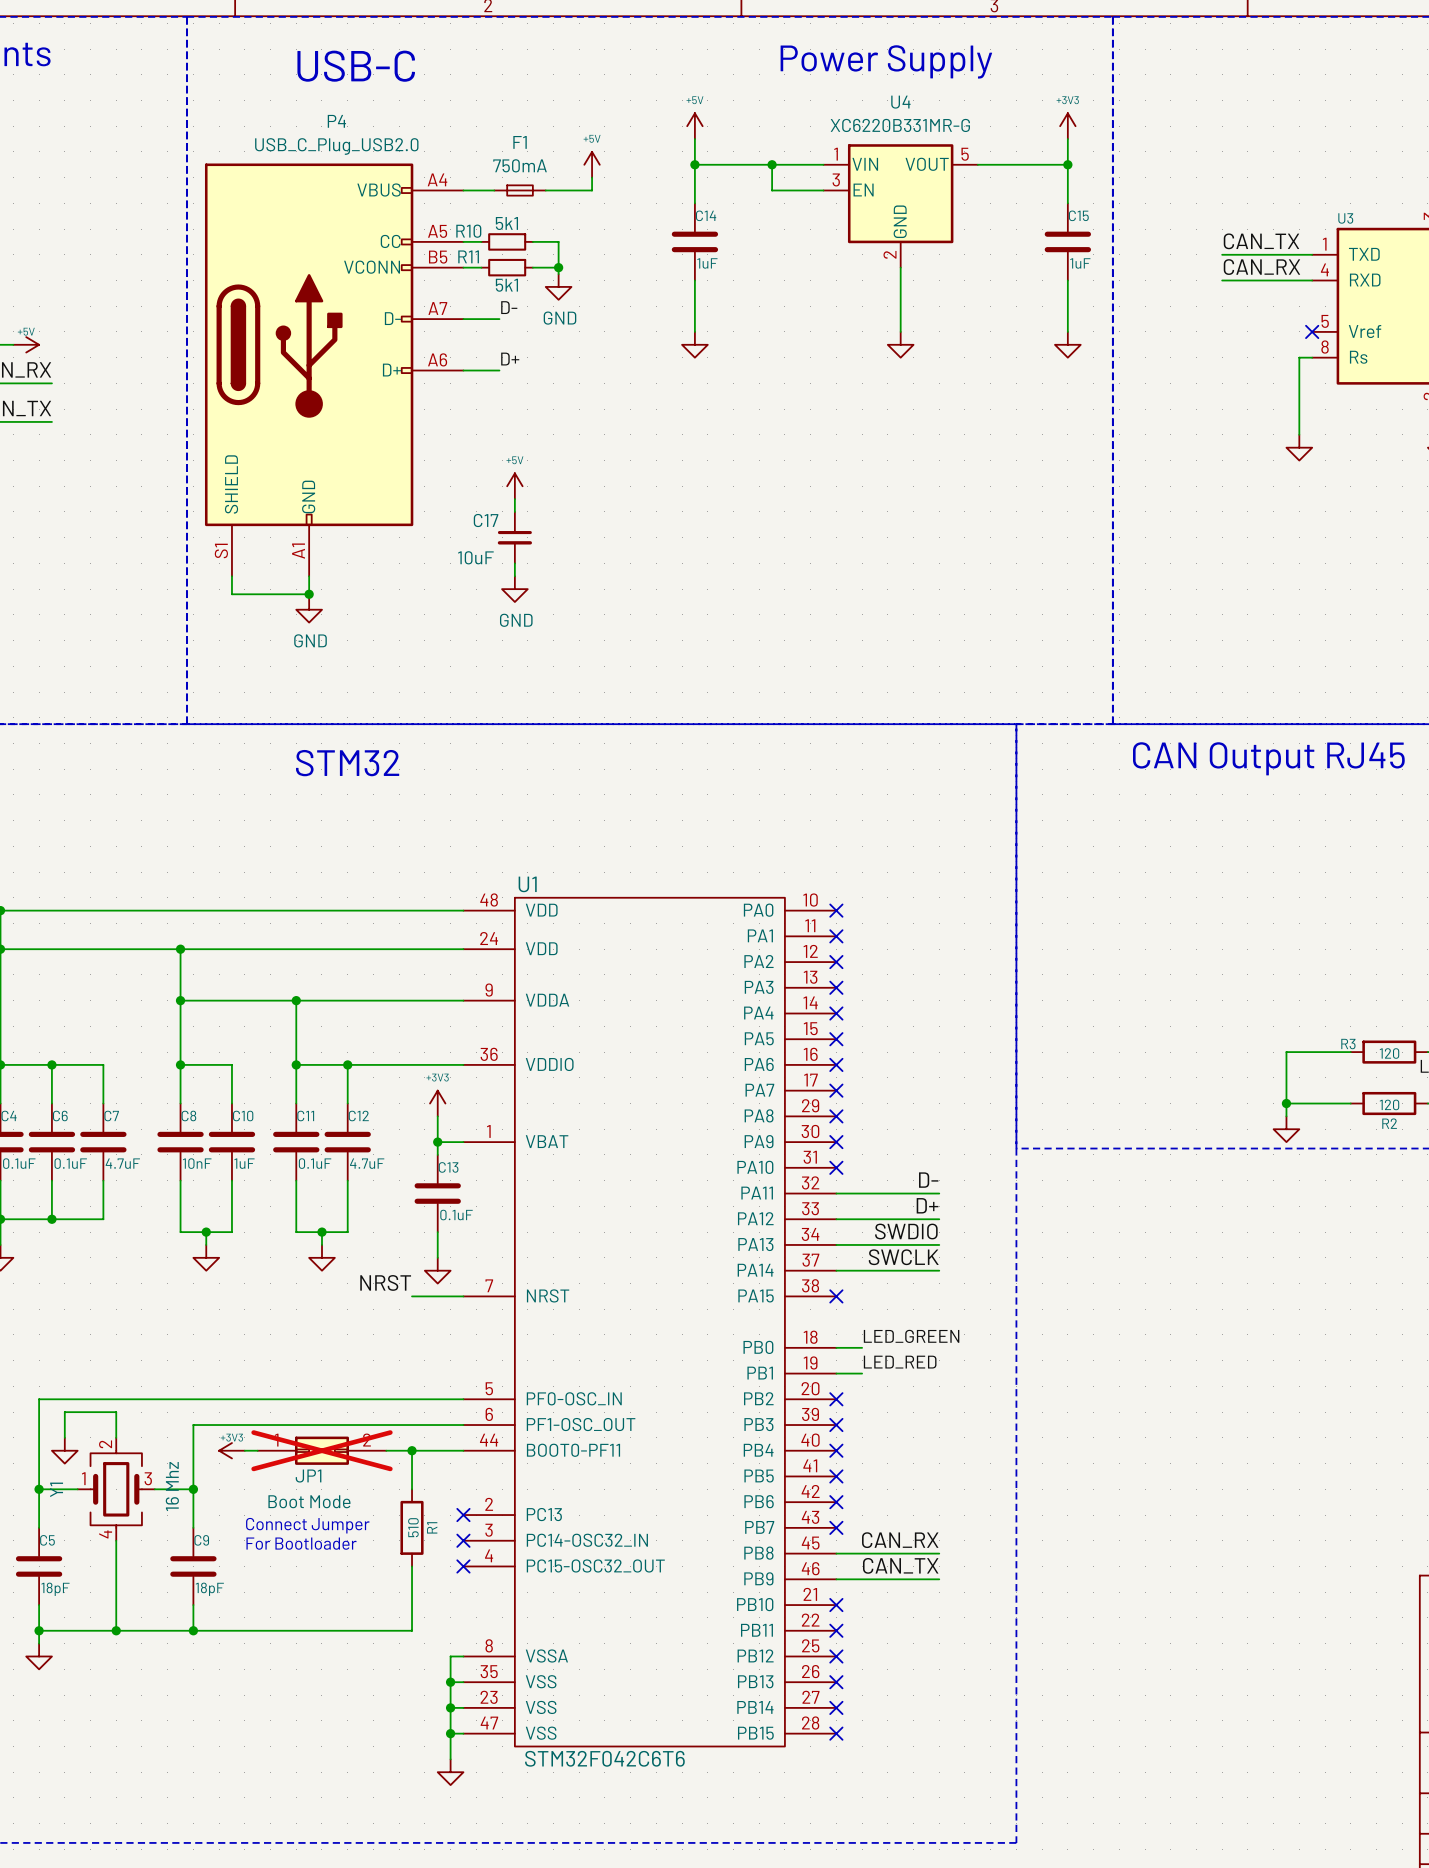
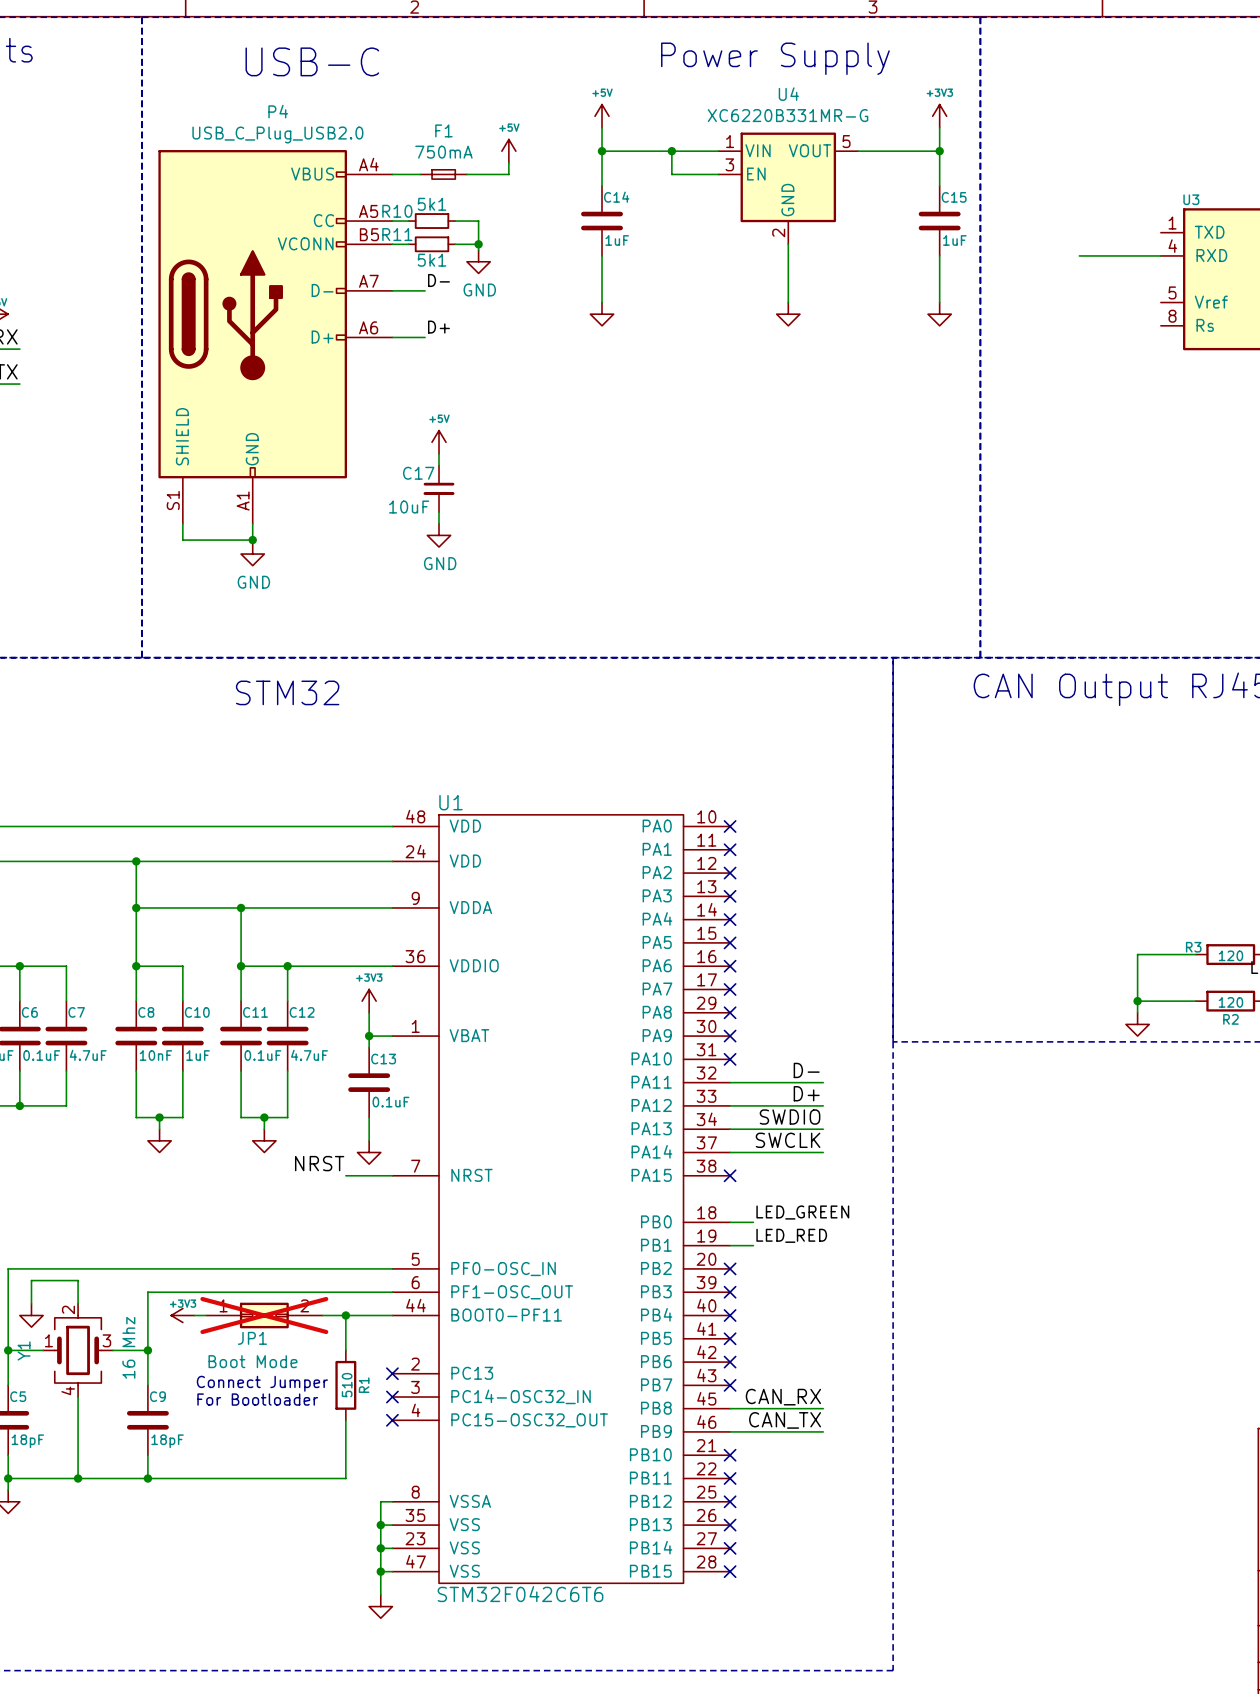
label: CAN_TX (1261, 241) -> none
wire: (1222, 254) (1312, 254) -> none
label: CAN_RX (1261, 267) -> none
no-connect mark: (1312, 331) -> none
wire: (1312, 357) (1299, 357) (1299, 434) -> none
power symbol: (1299, 447) -> none

